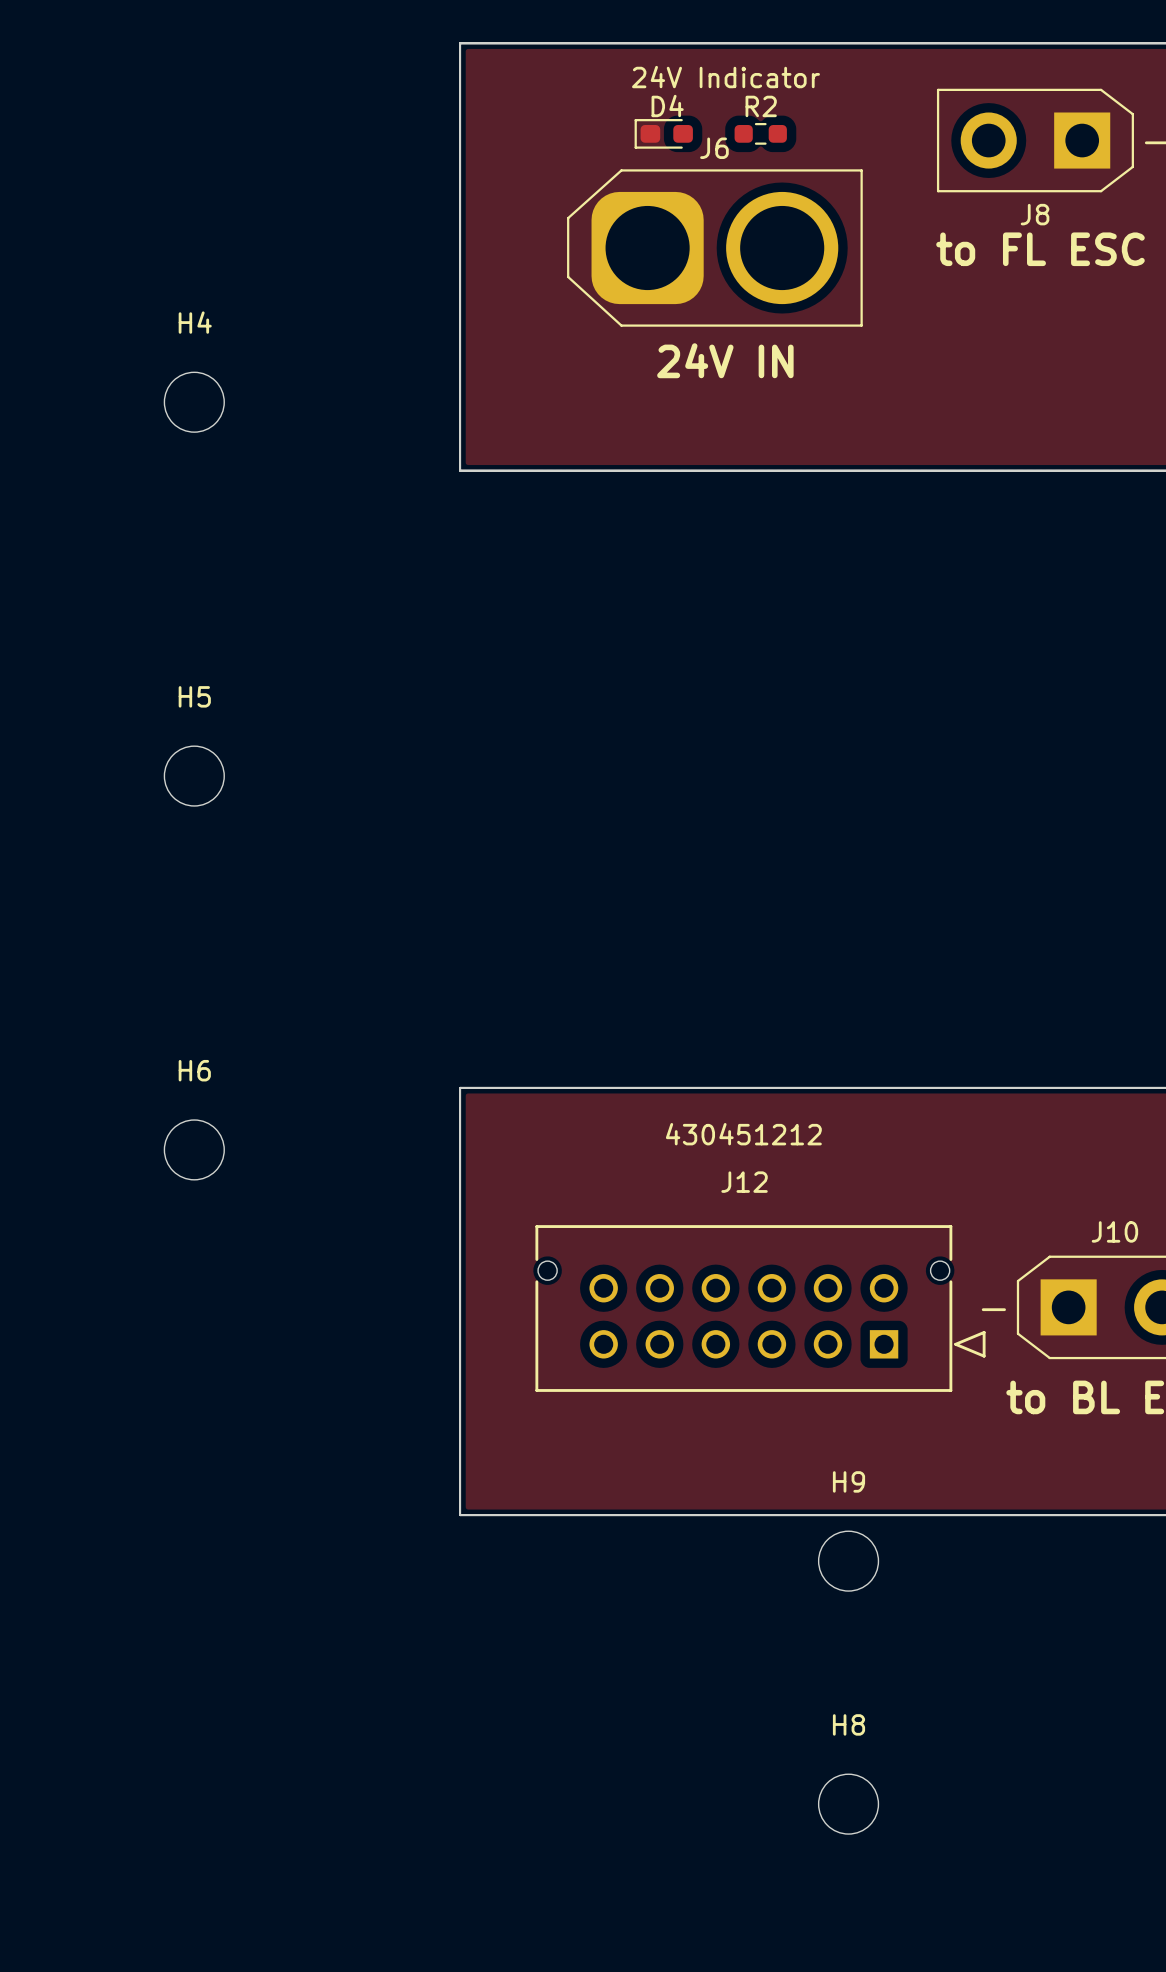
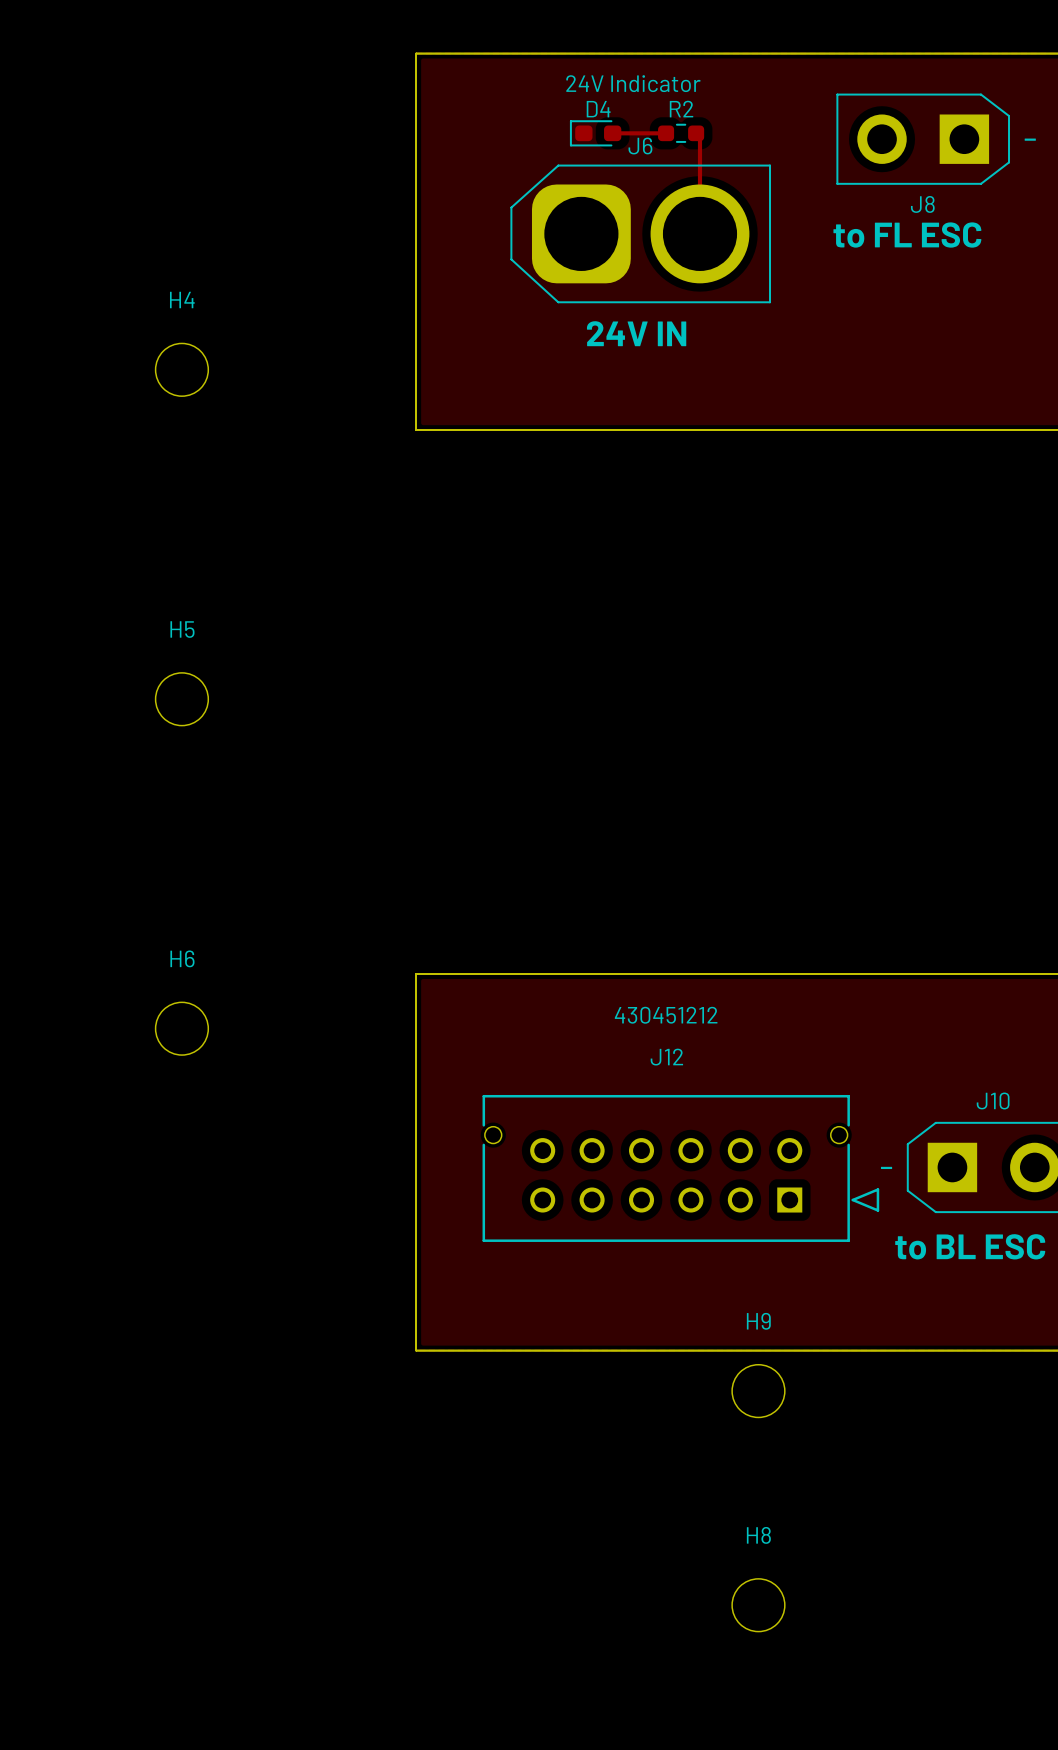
track: none -> (612, 133) (666, 133)
track: none -> (696, 133) (699, 137) (699, 233)

